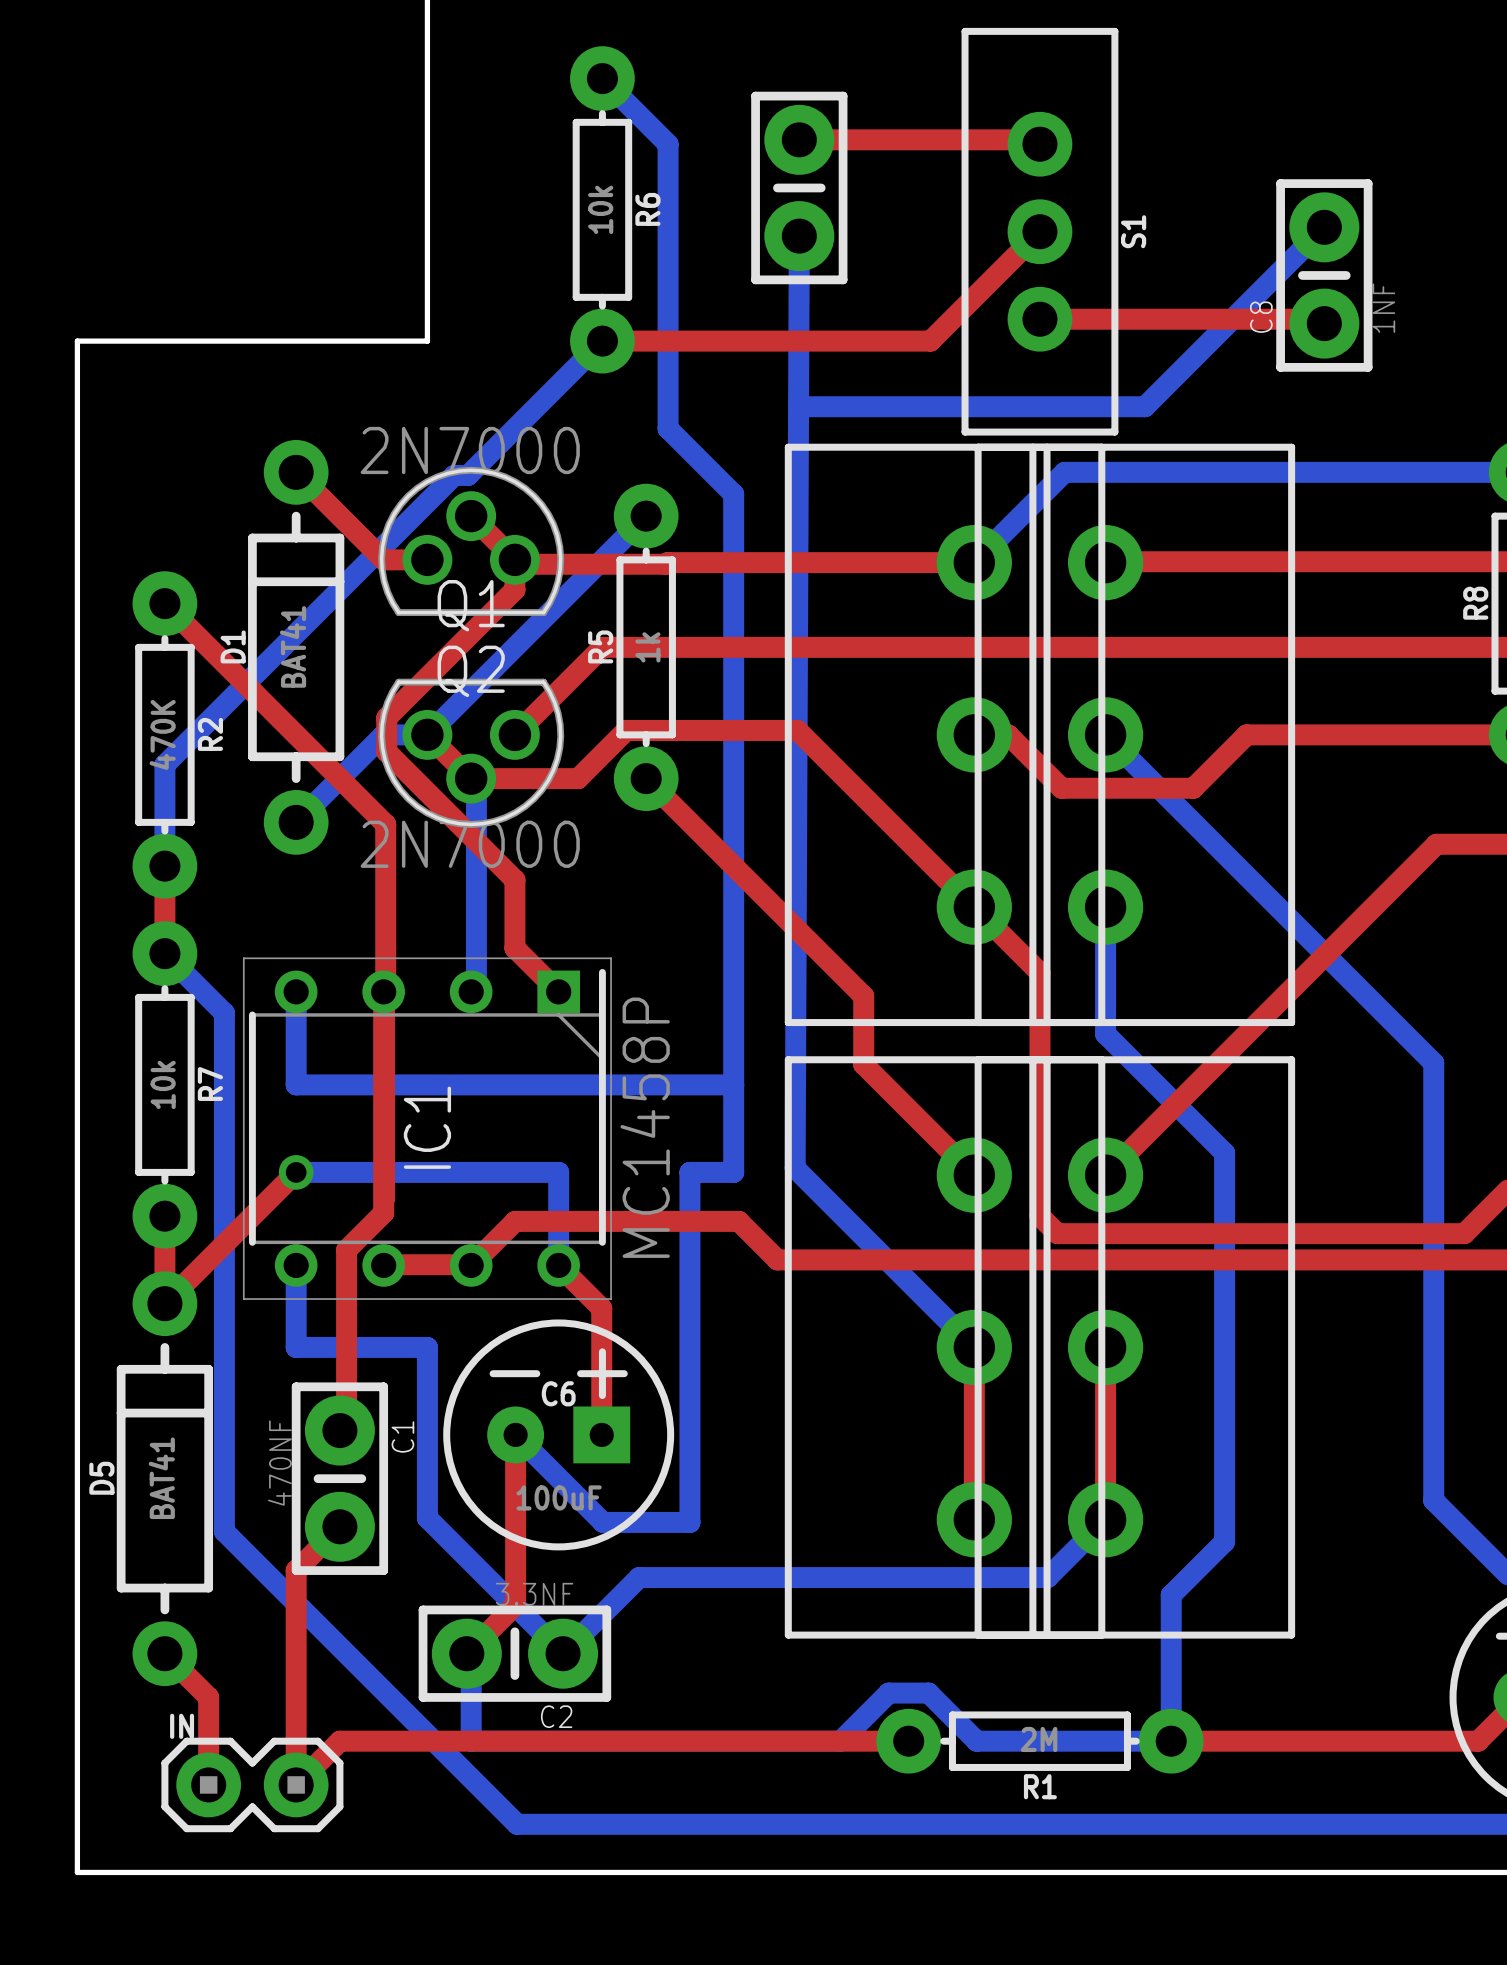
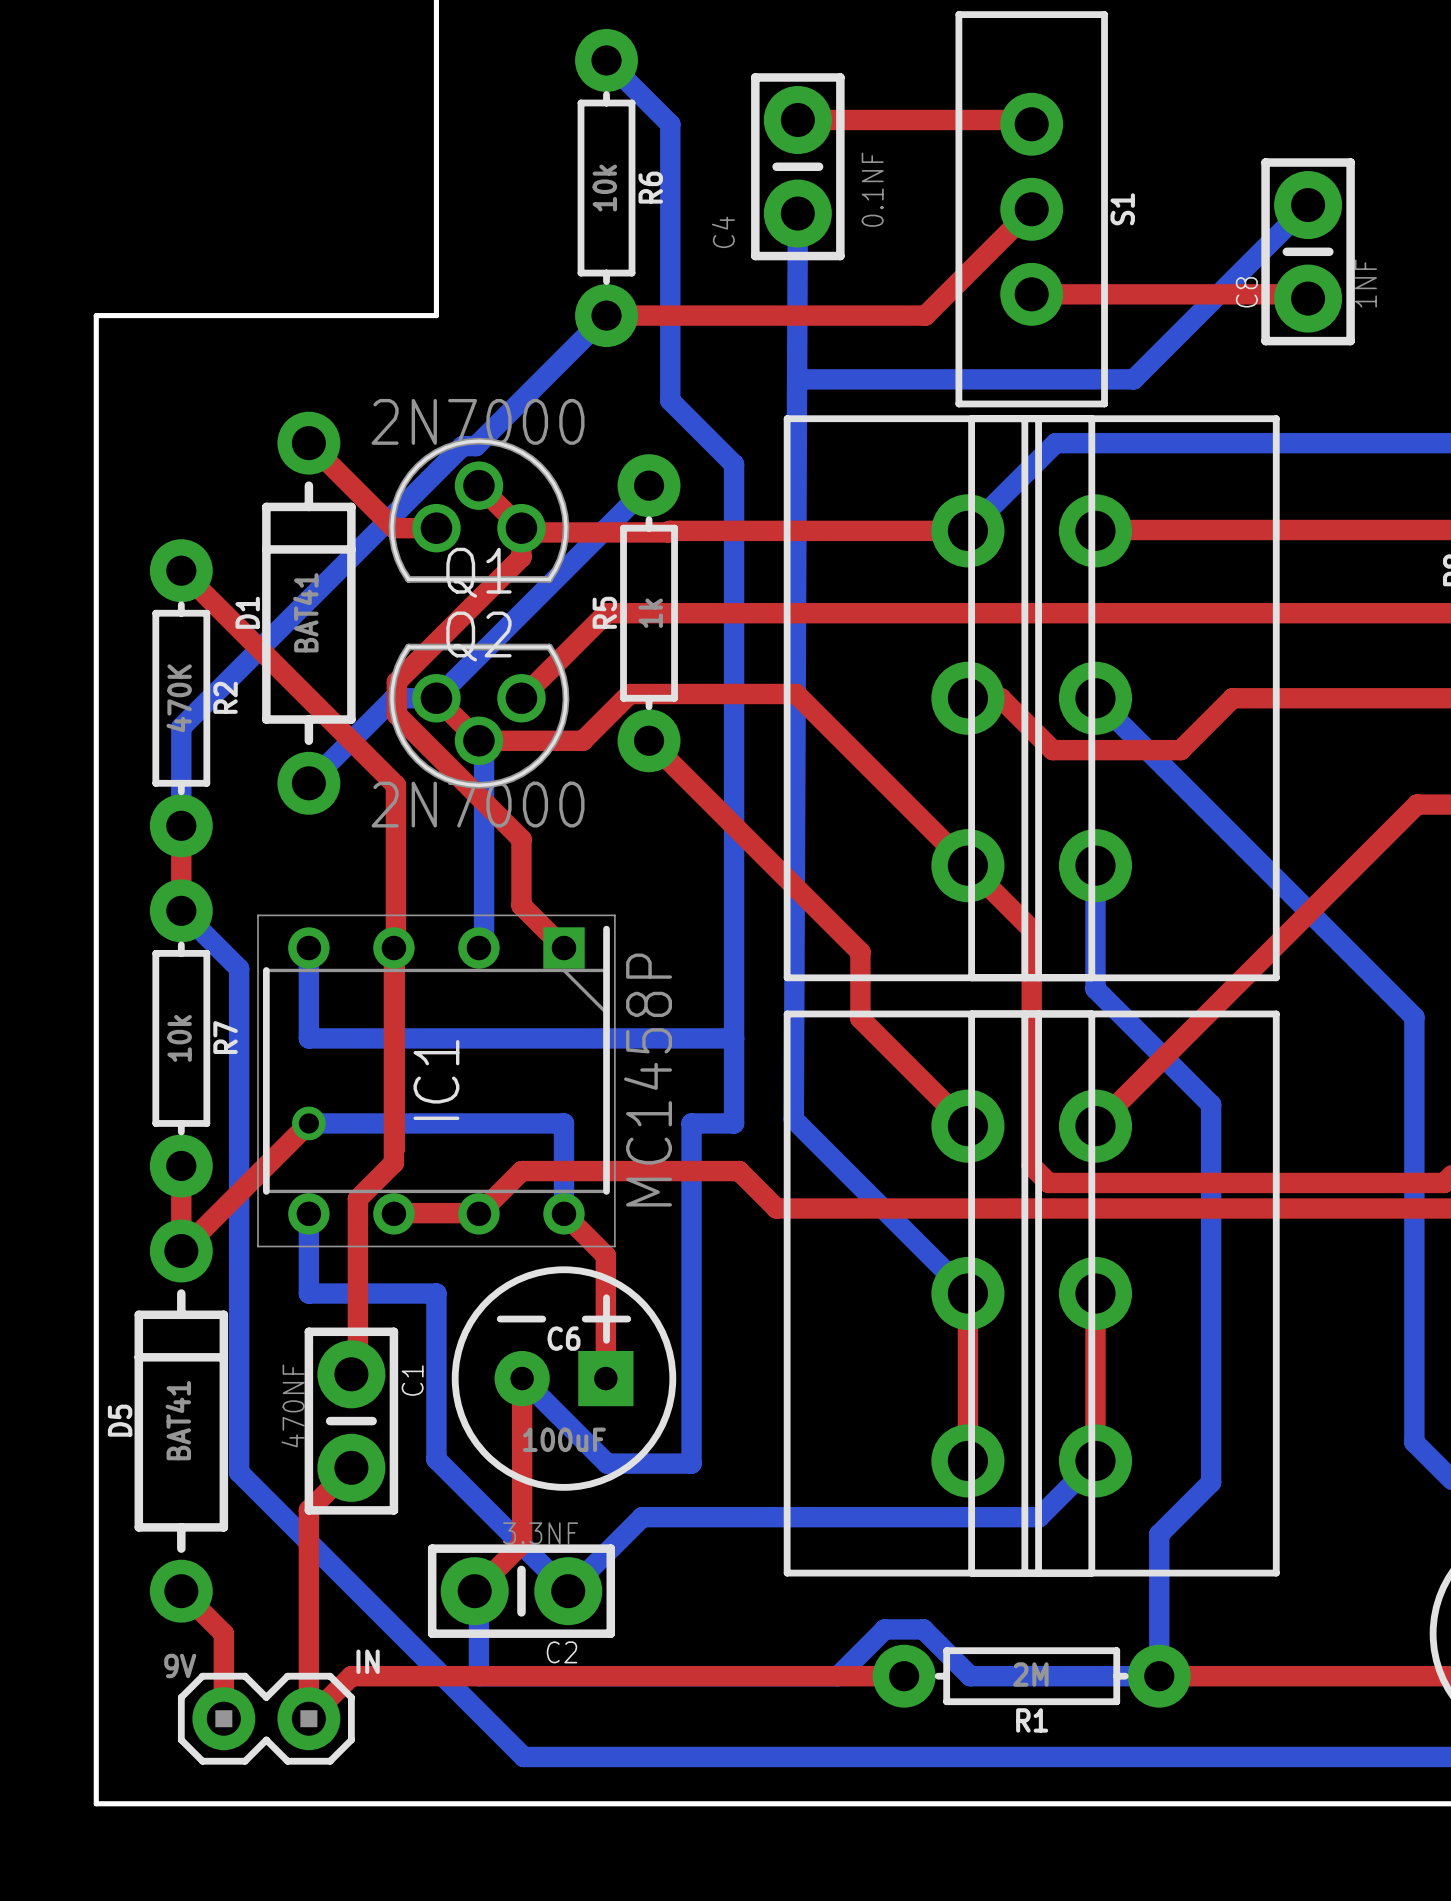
text: none -> 0.1NF (872, 189)
text: none -> C4 (723, 232)
IN name position: IN (182, 1726) -> IN (368, 1661)
text: none -> 9V (180, 1666)

